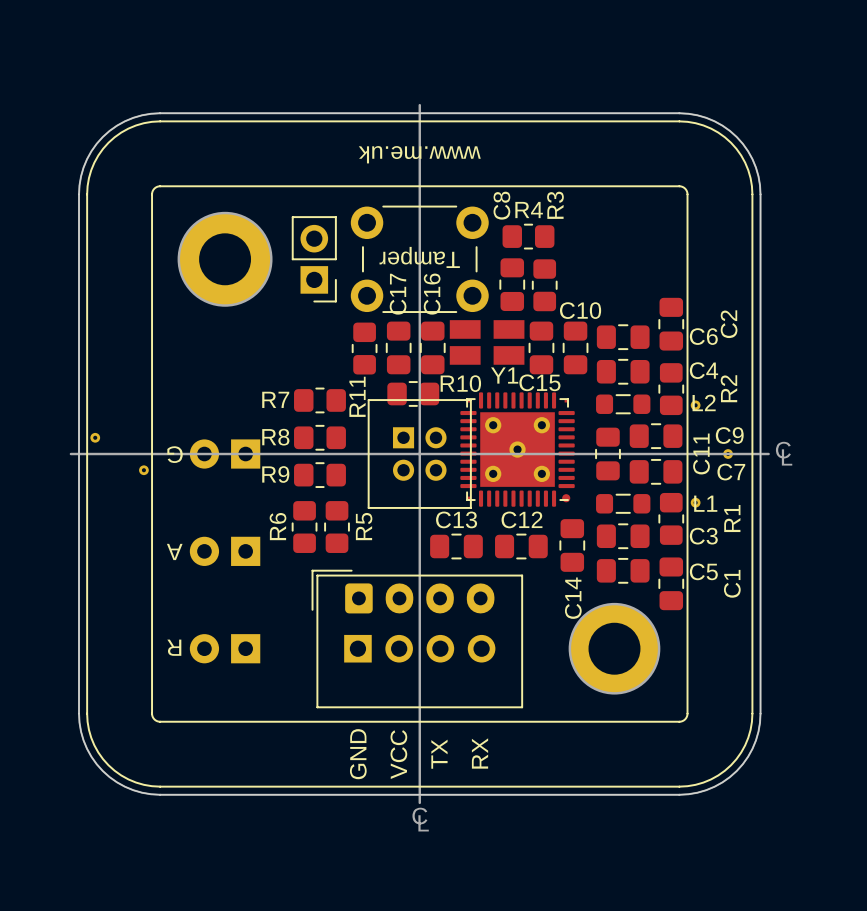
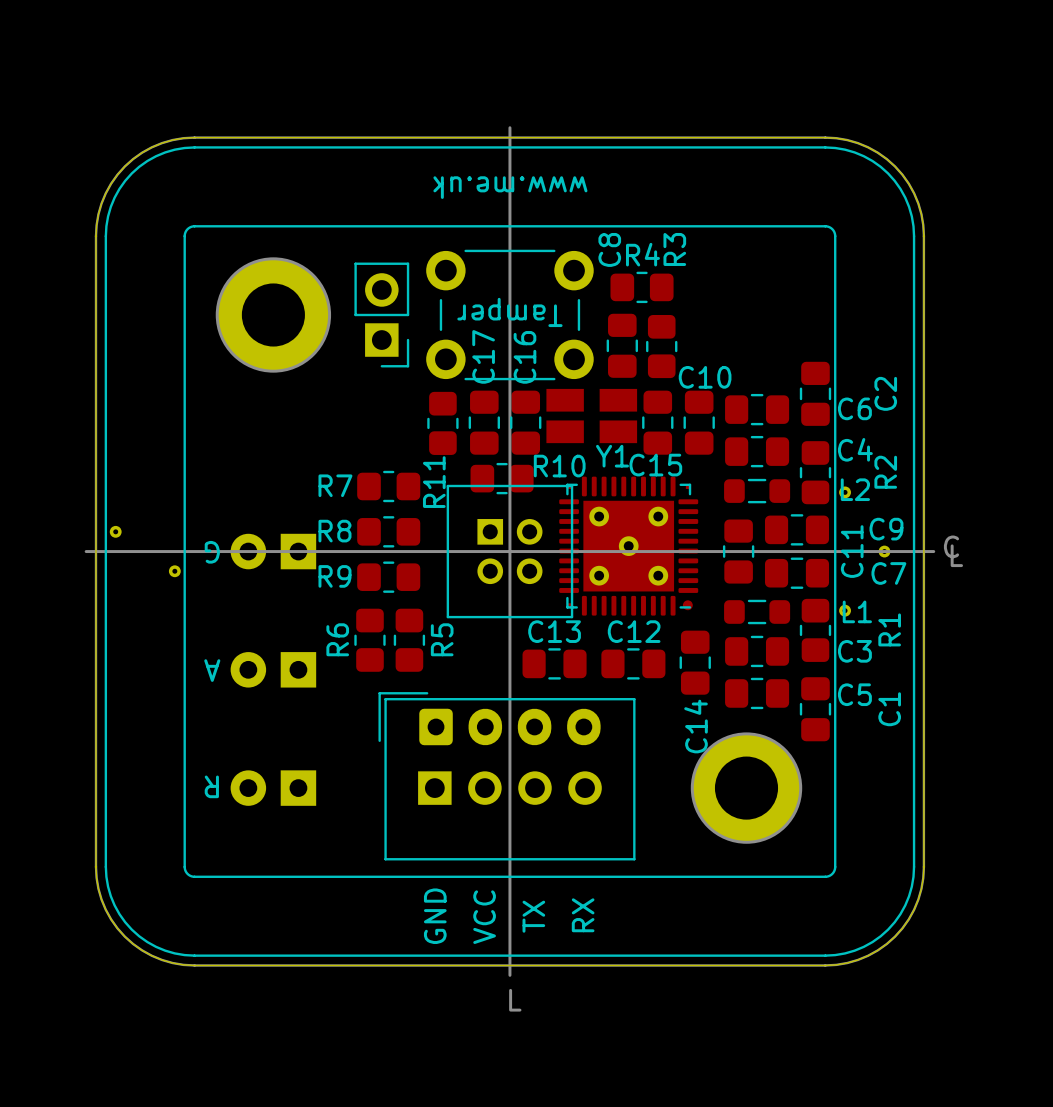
text: C (419, 816) -> none

